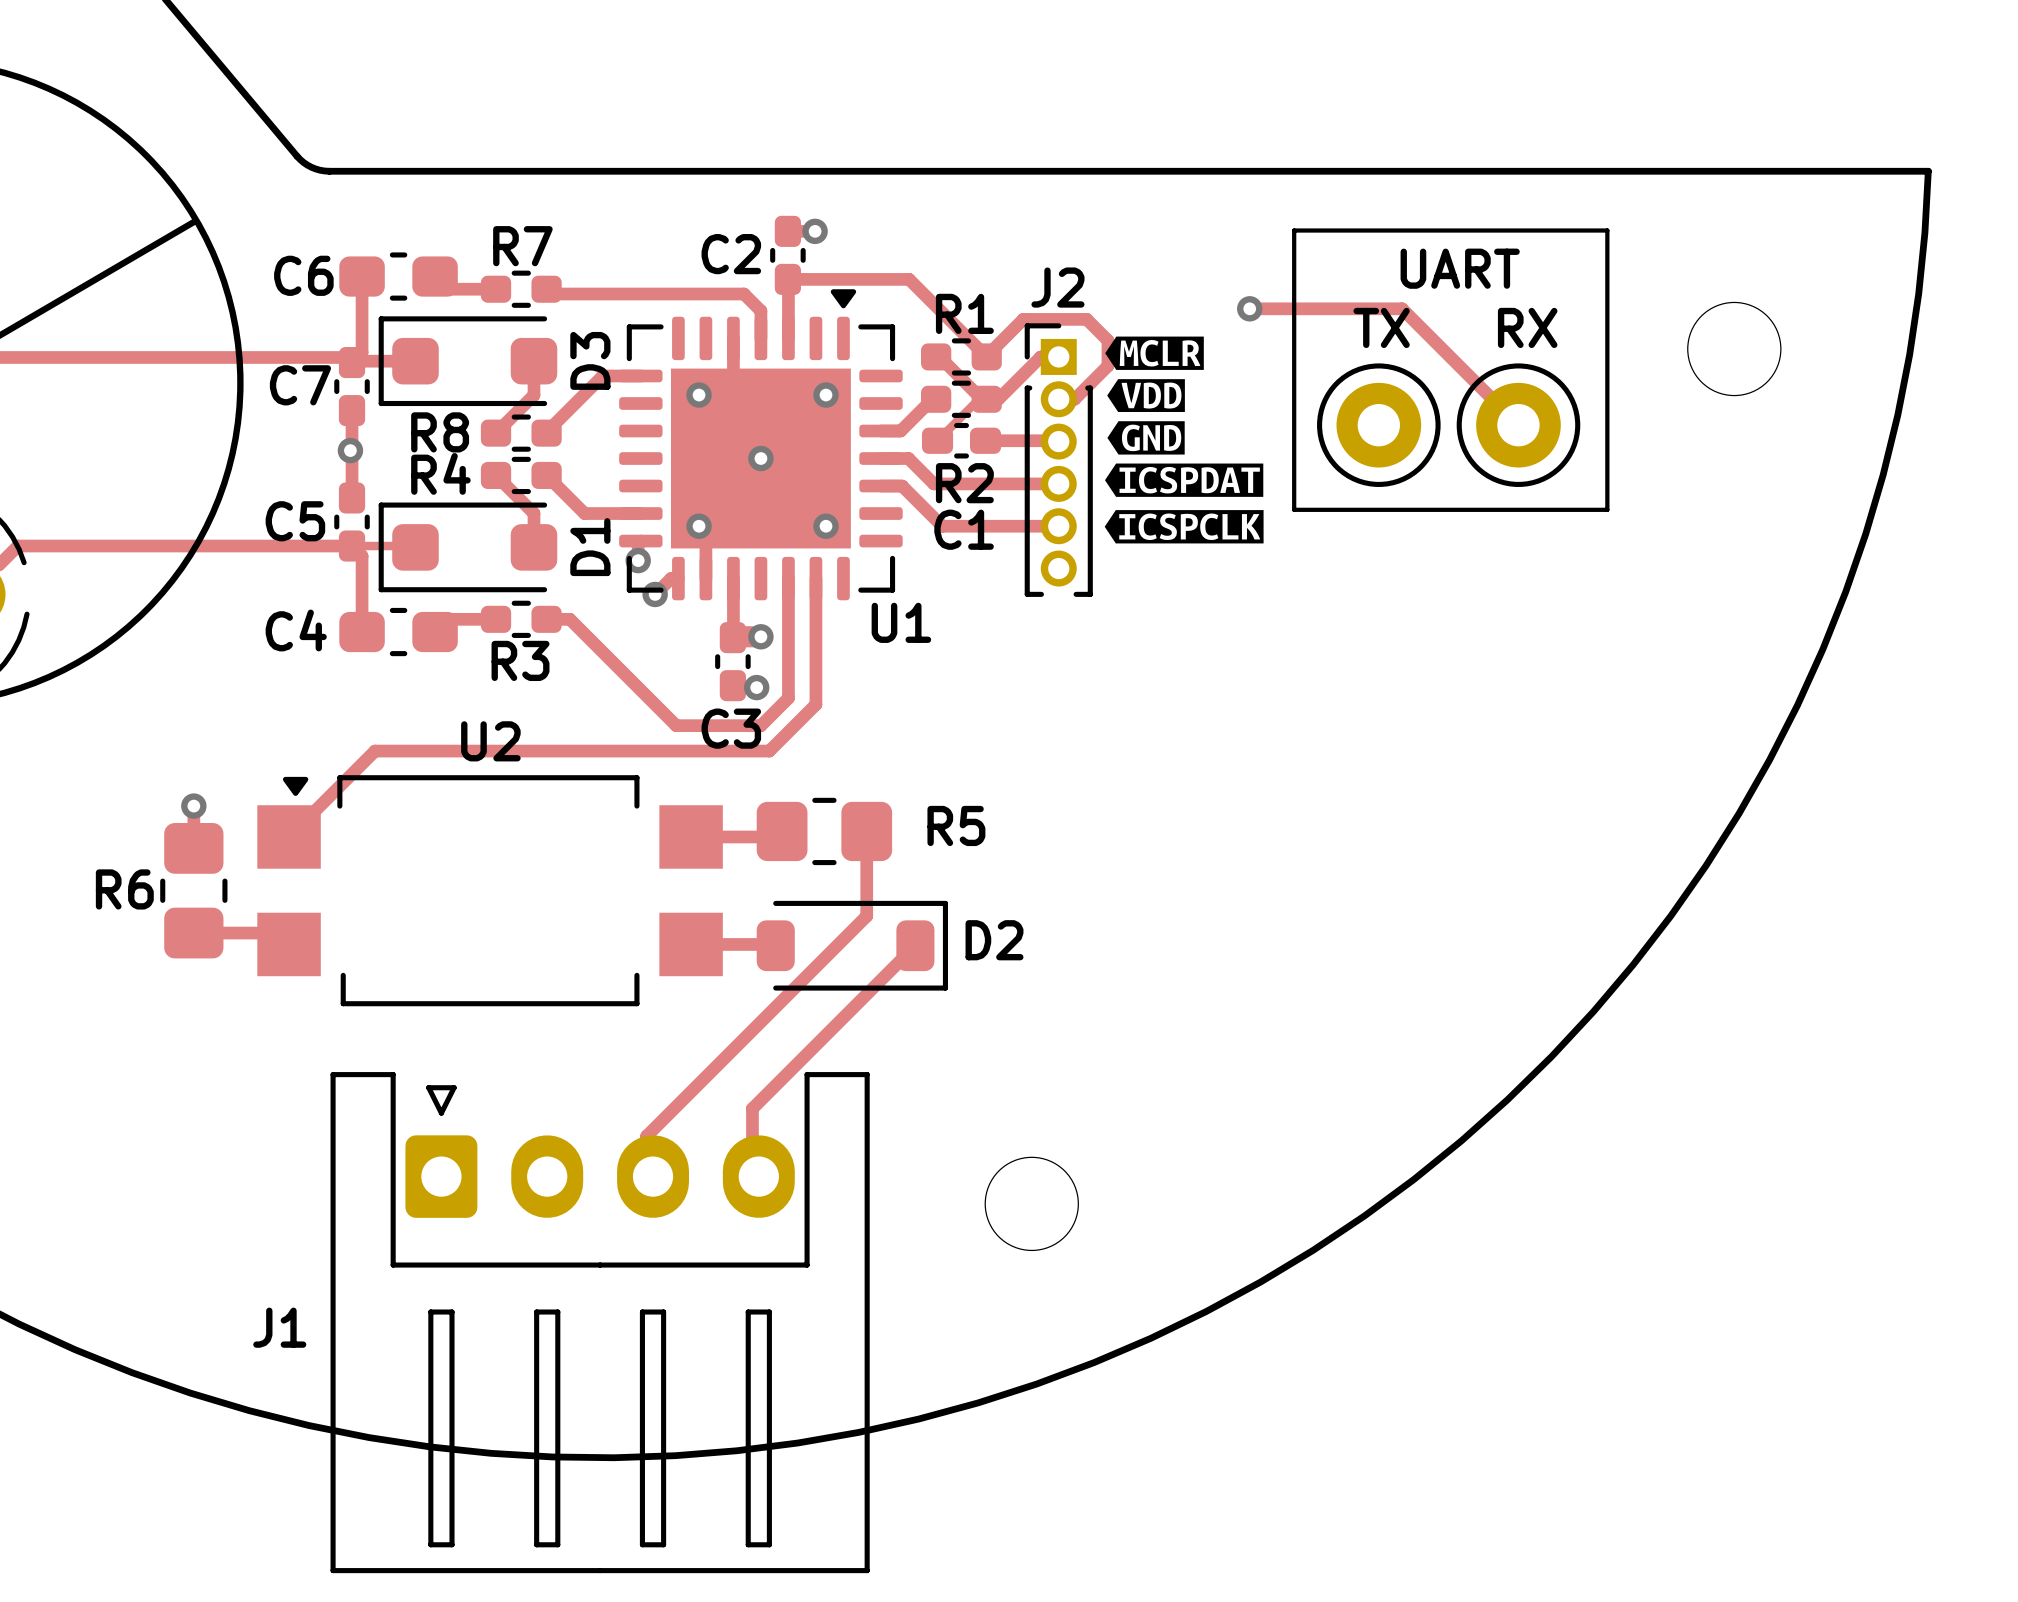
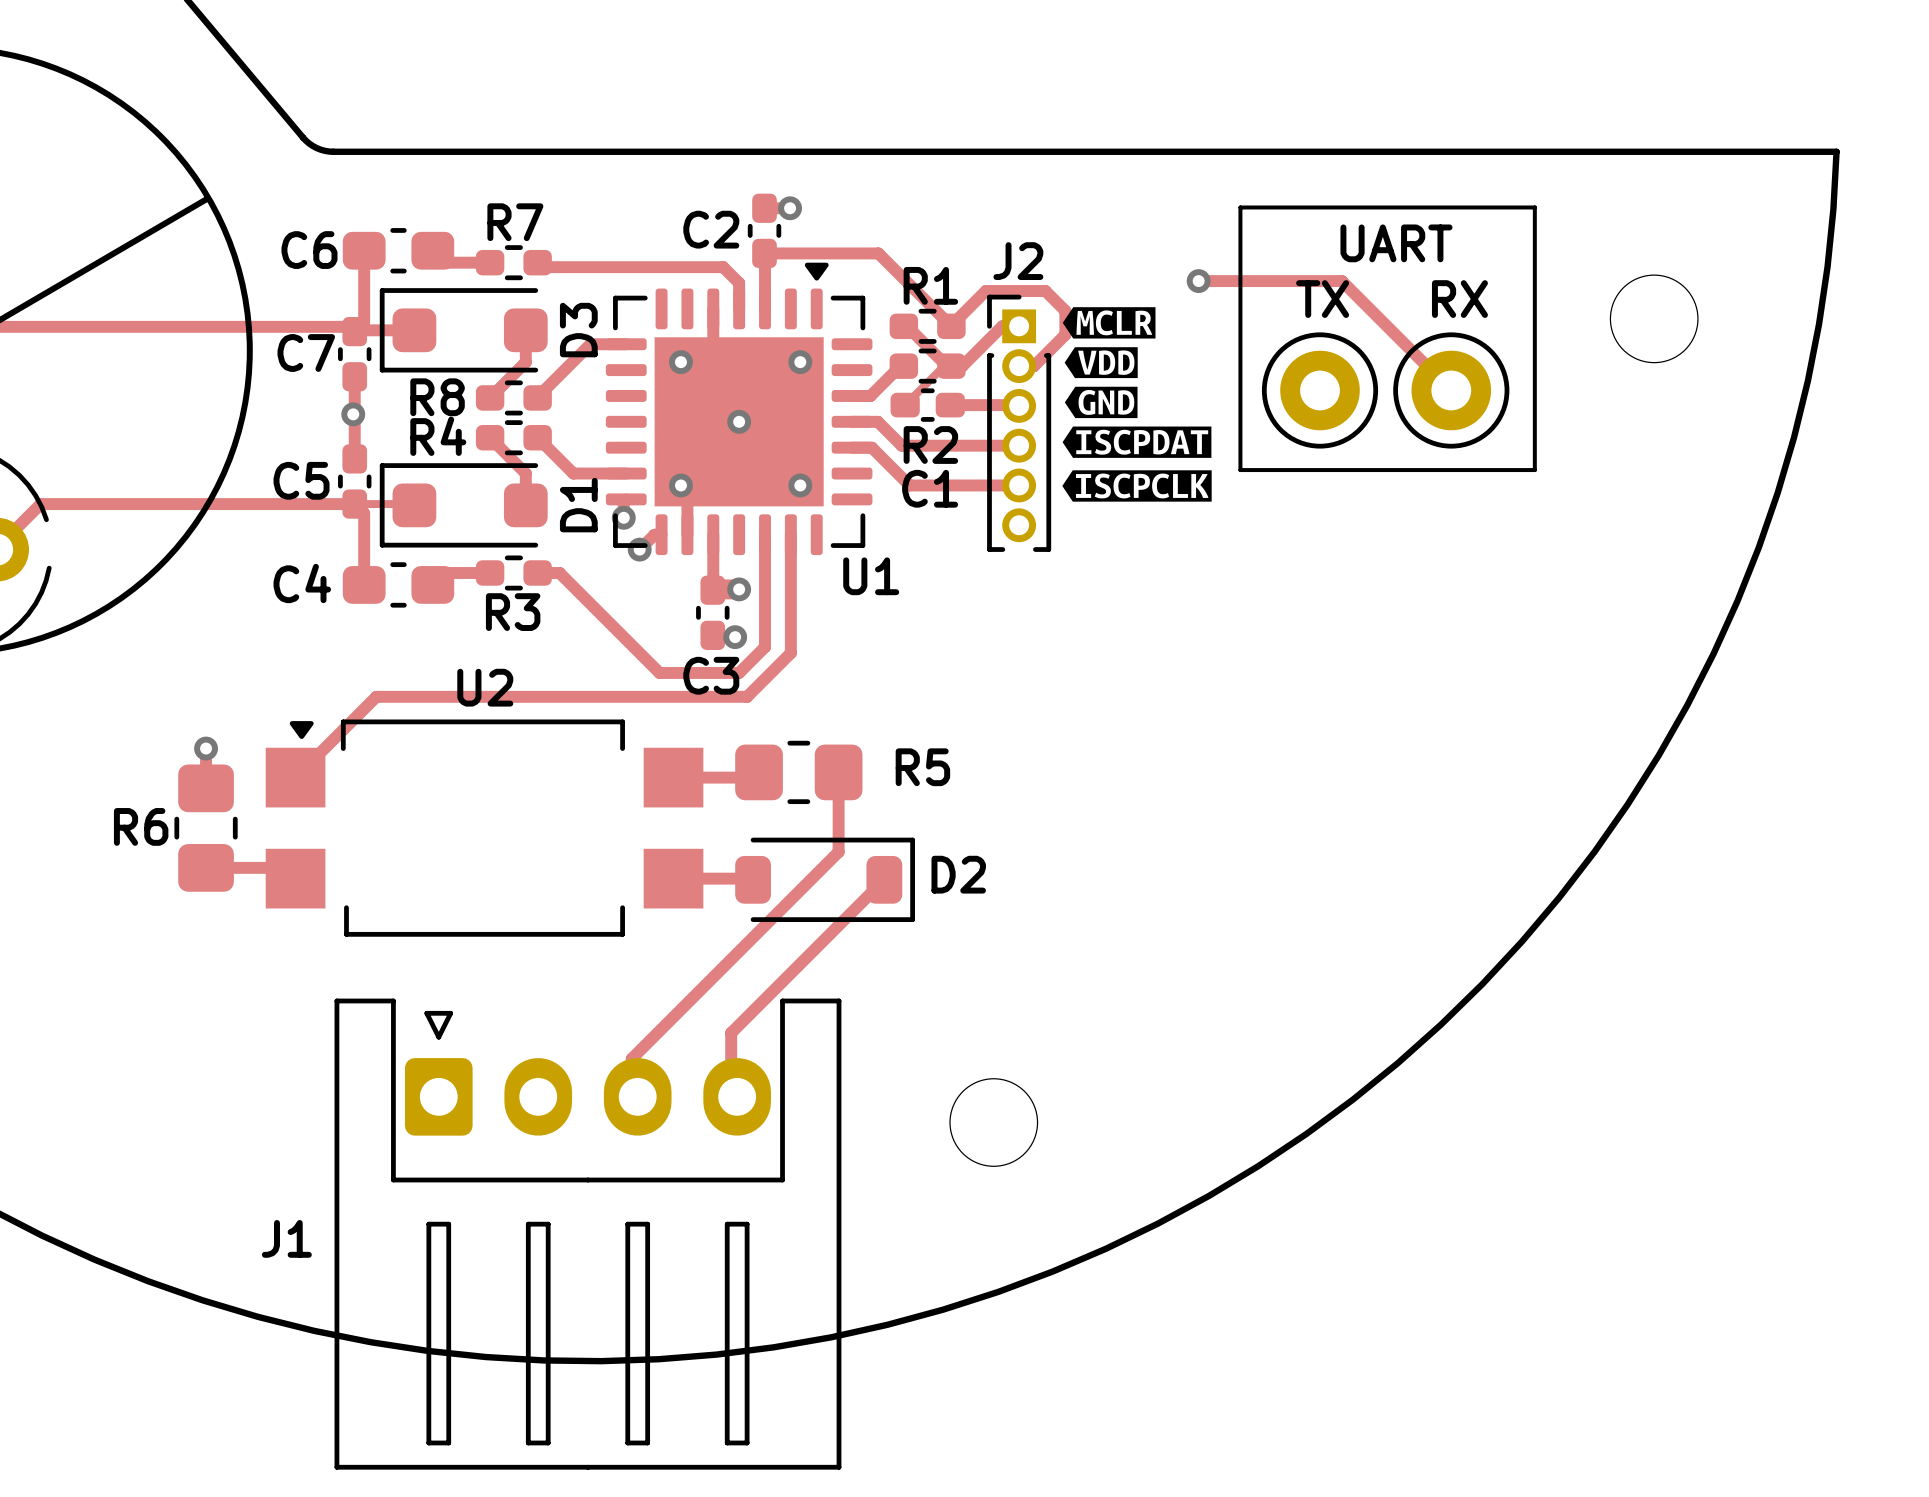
drawing shape: [1105, 463, 1264, 497] -> [1062, 426, 1212, 458]
drawing shape: [1104, 510, 1264, 544] -> [1062, 470, 1212, 502]

